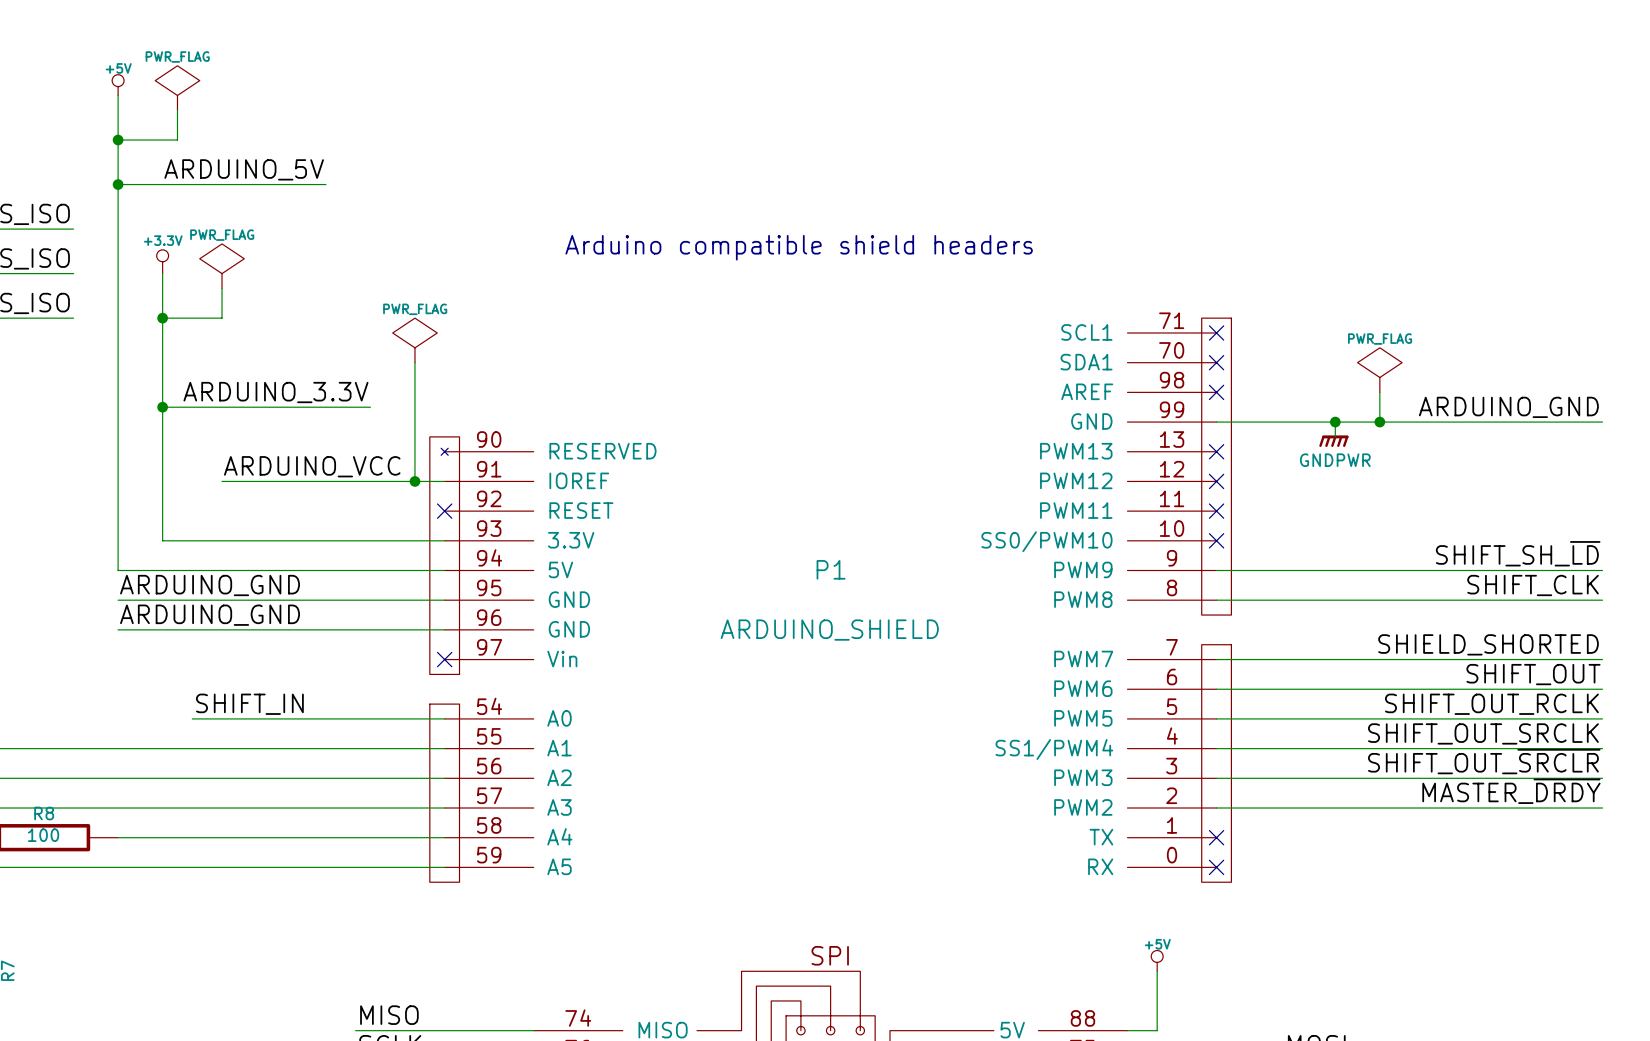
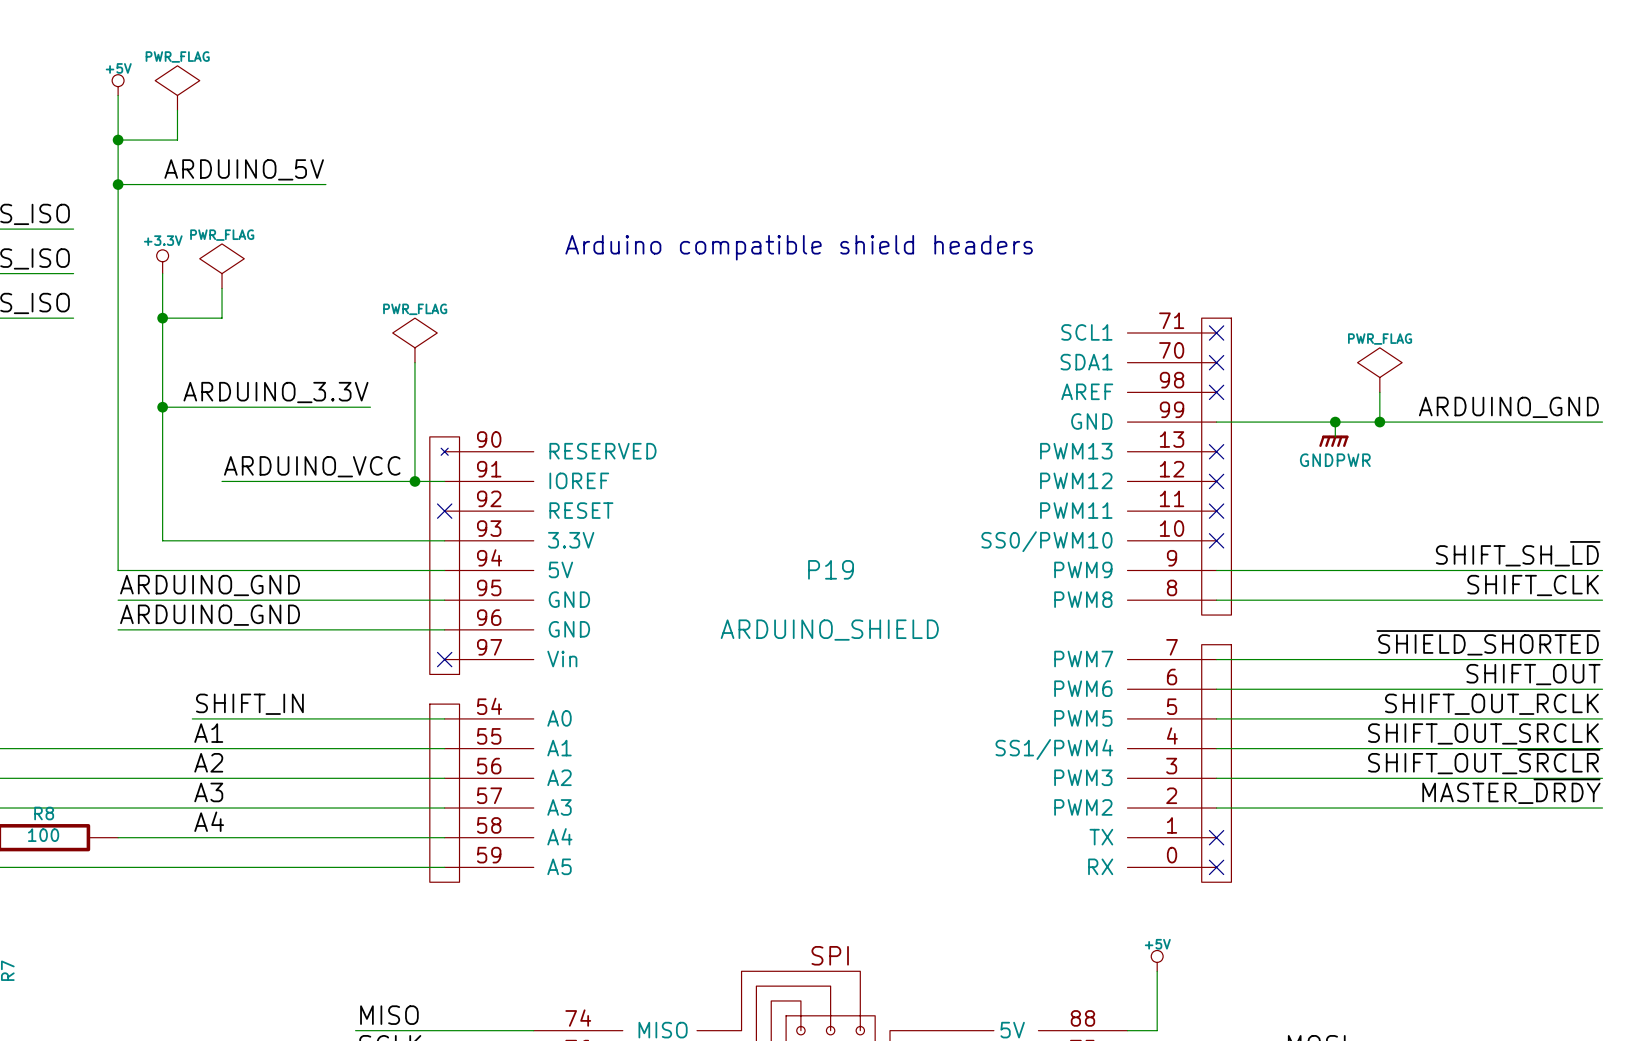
P1 name: P1 (831, 569) -> P19 (831, 569)
label: SHIELD_SHORTED (1488, 644) -> ~{SHIELD_SHORTED} (1488, 642)
label: none -> A1 (208, 733)
label: none -> A2 (208, 762)
label: none -> A3 (208, 792)
label: none -> A4 (209, 821)

